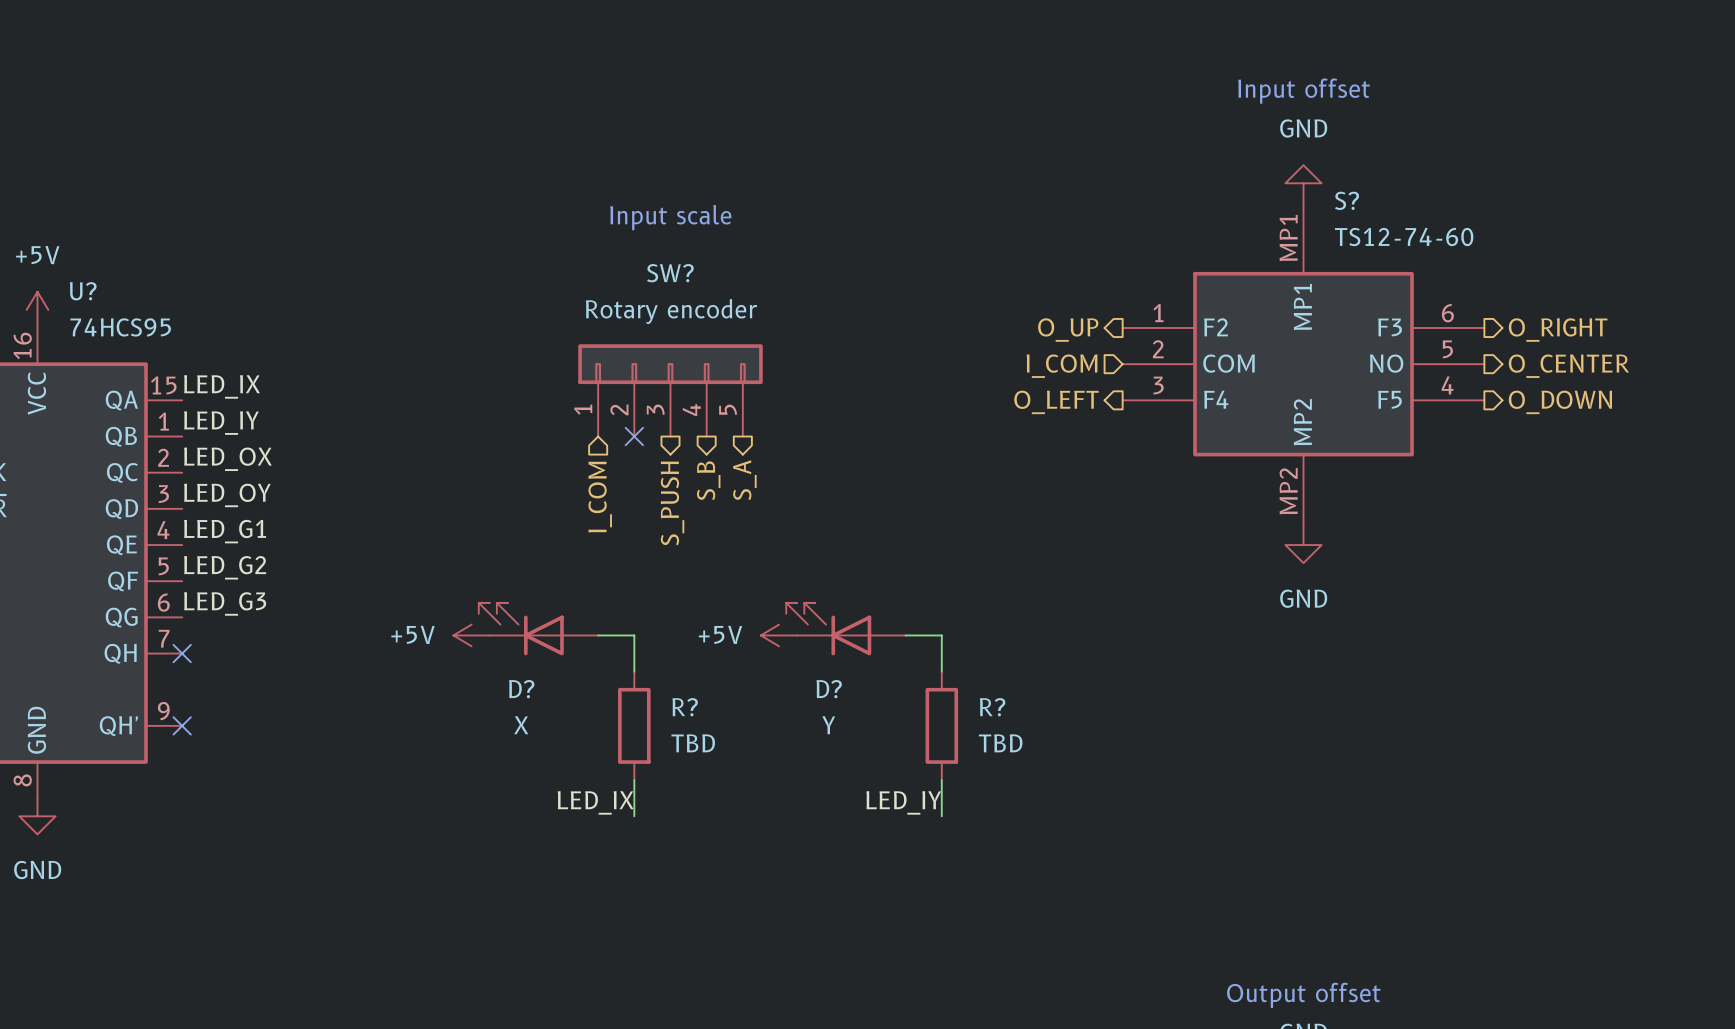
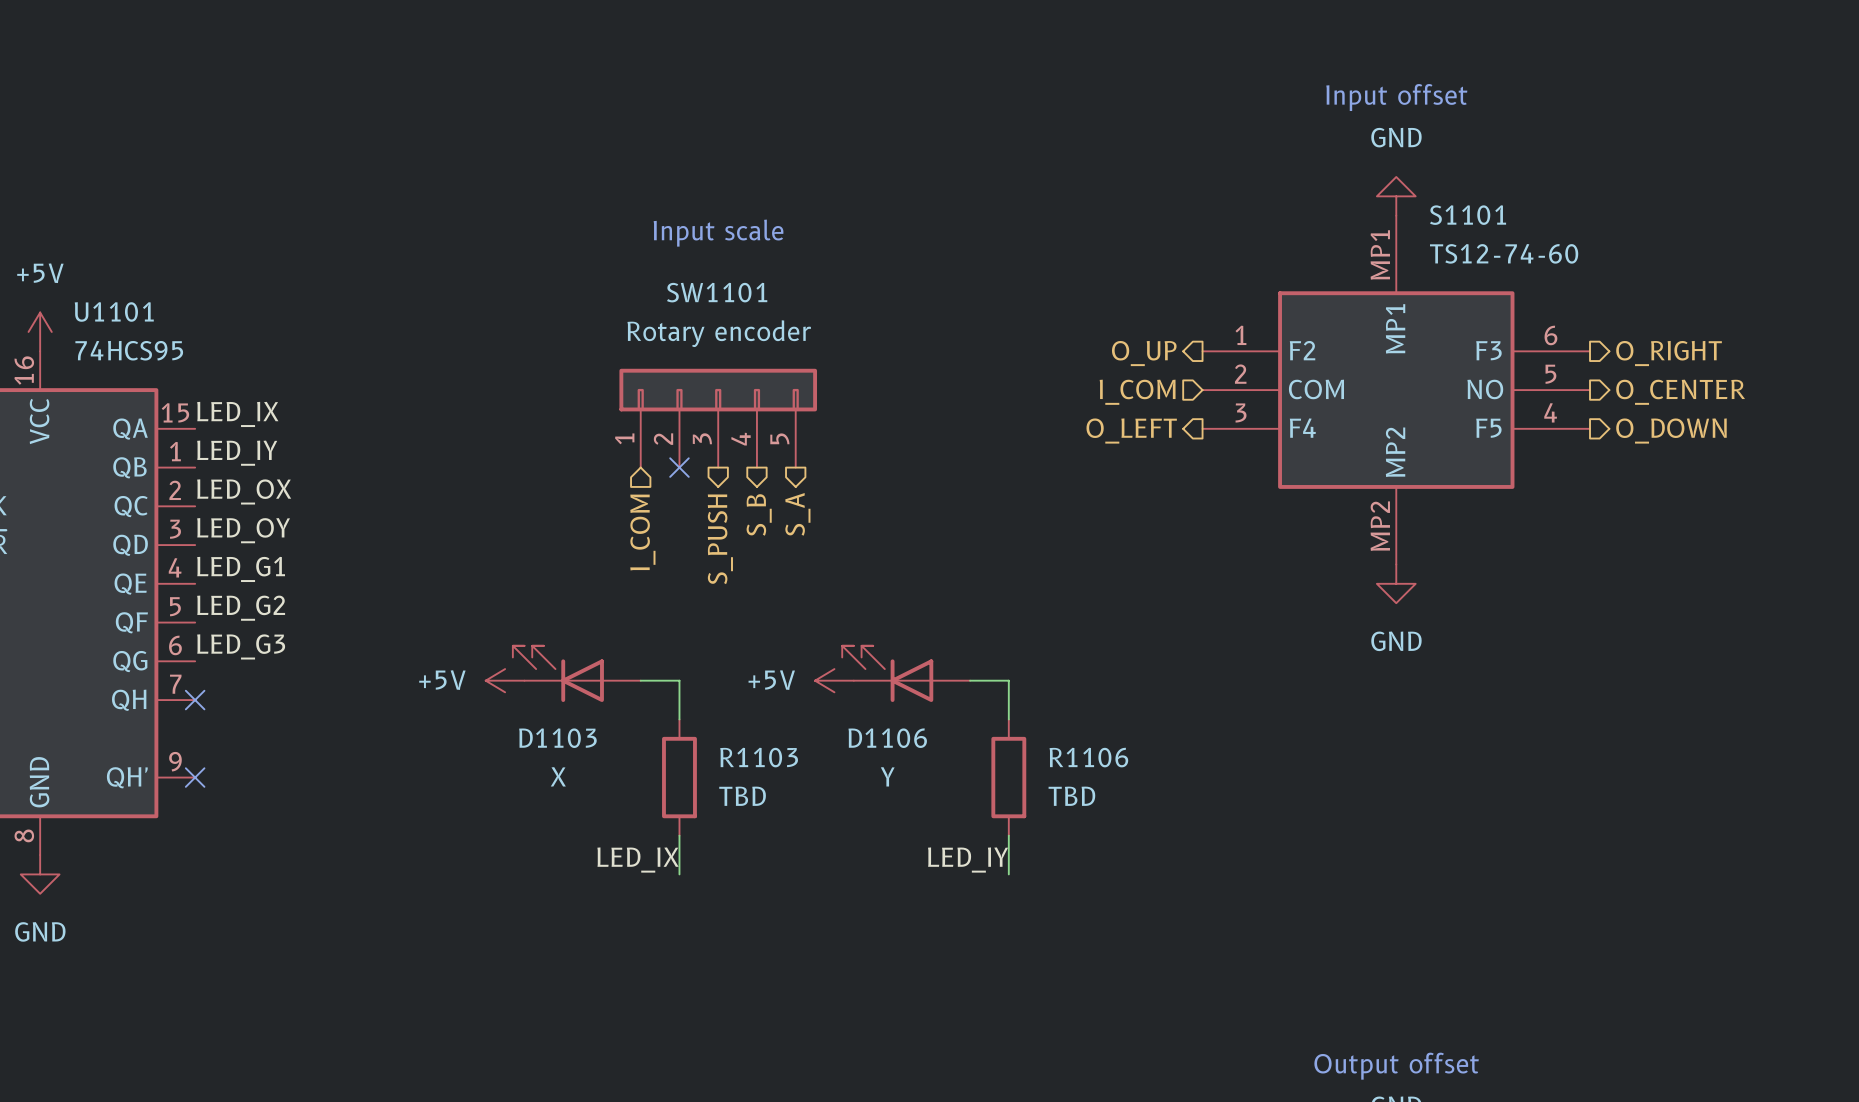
S? name: S? (1347, 200) -> S1101 (1468, 215)
SW? name: SW? (670, 273) -> SW1101 (717, 292)
U? name: U? (83, 291) -> U1101 (114, 311)
D? name: D? (521, 689) -> D1103 (557, 738)
D? name: D? (829, 689) -> D1106 (887, 738)
R? name: R? (685, 707) -> R1103 (759, 757)
R? name: R? (992, 707) -> R1106 (1088, 757)

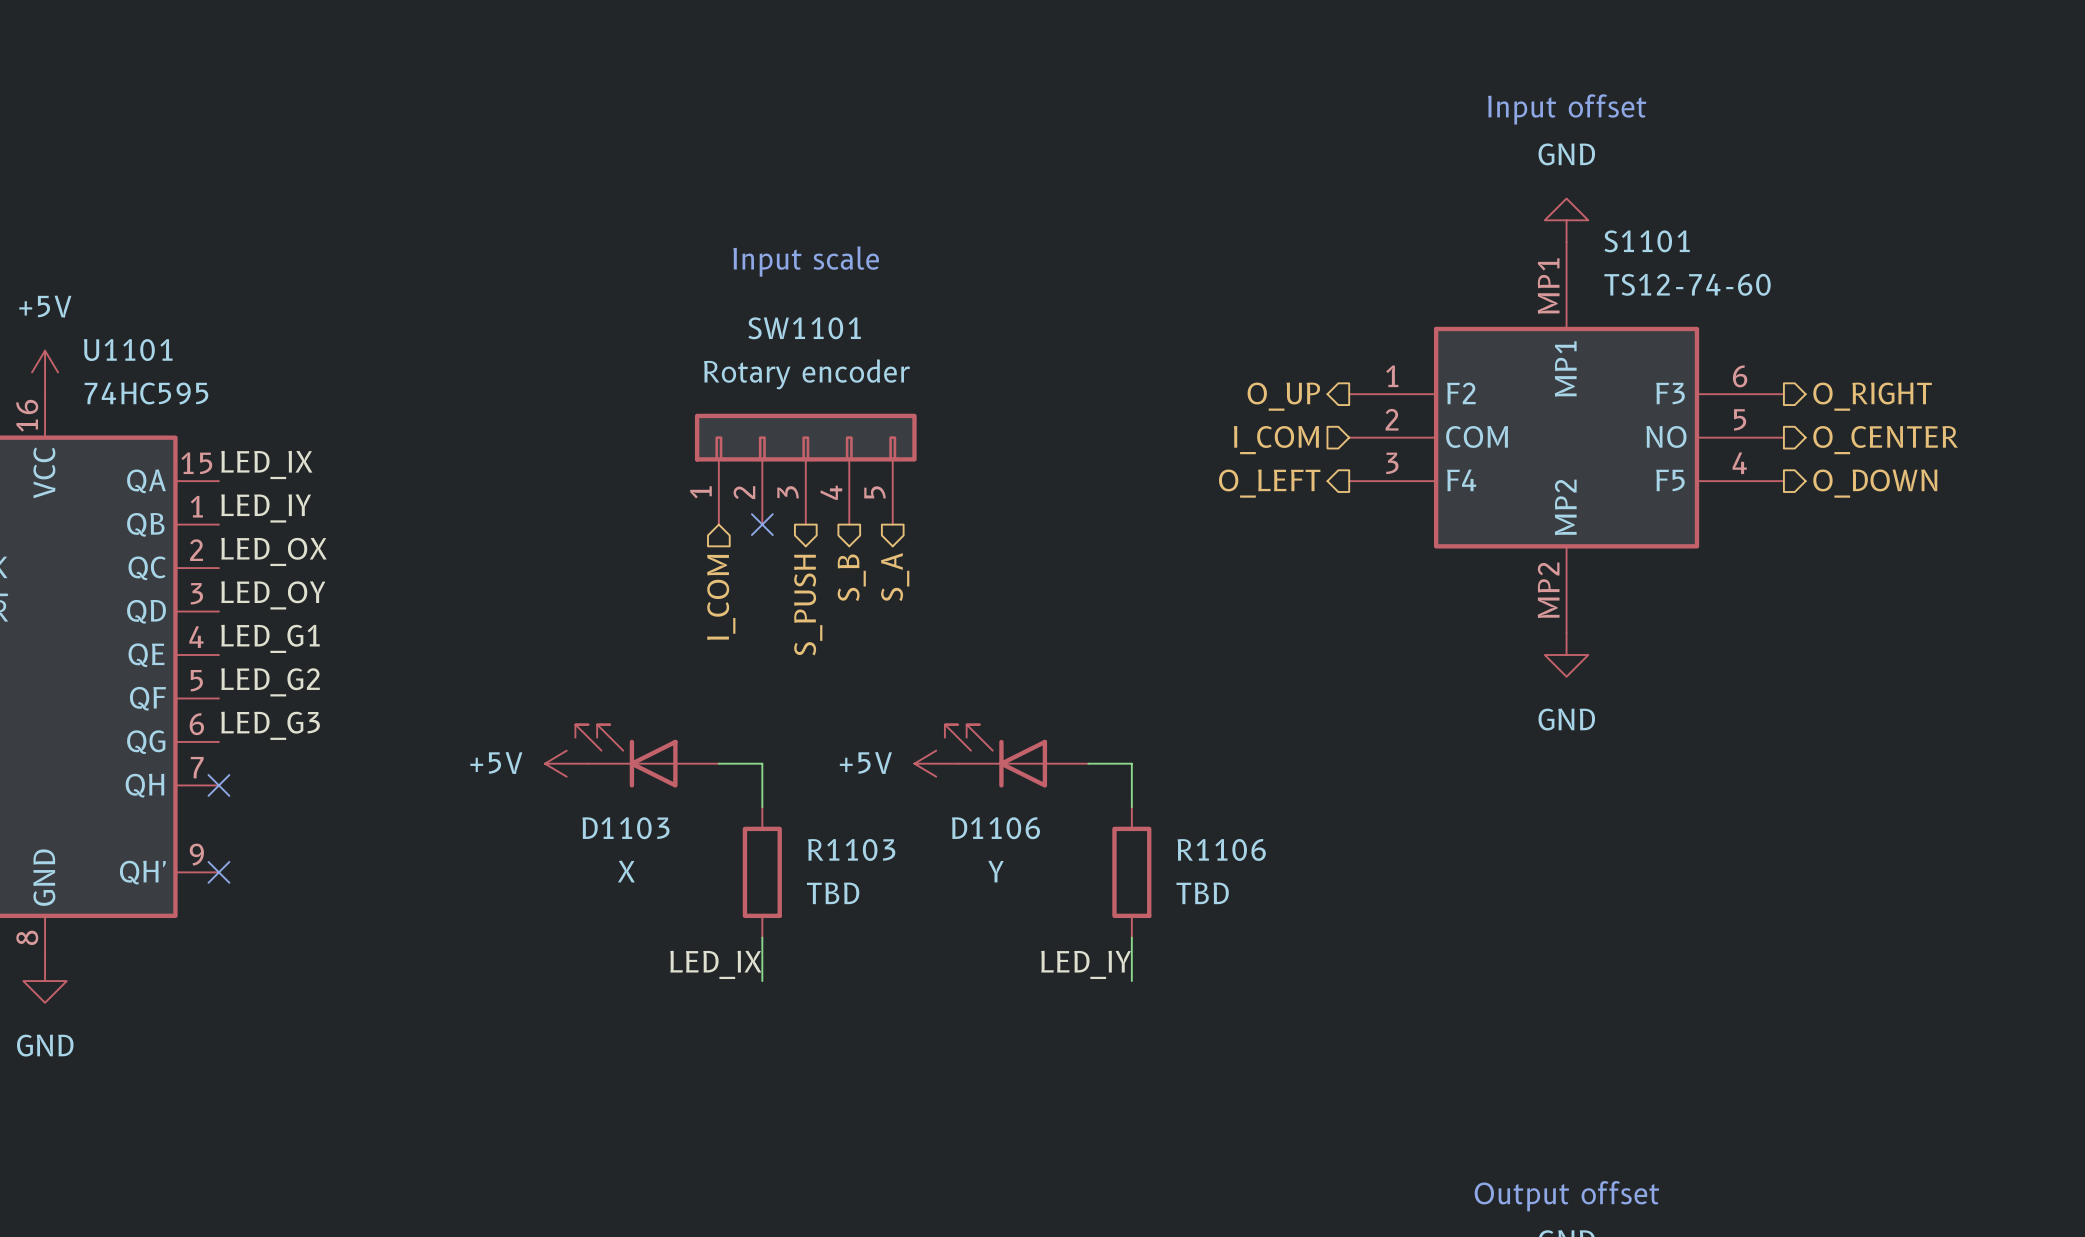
U1101 value: 74HCS95 (129, 350) -> 74HC595 (146, 393)

